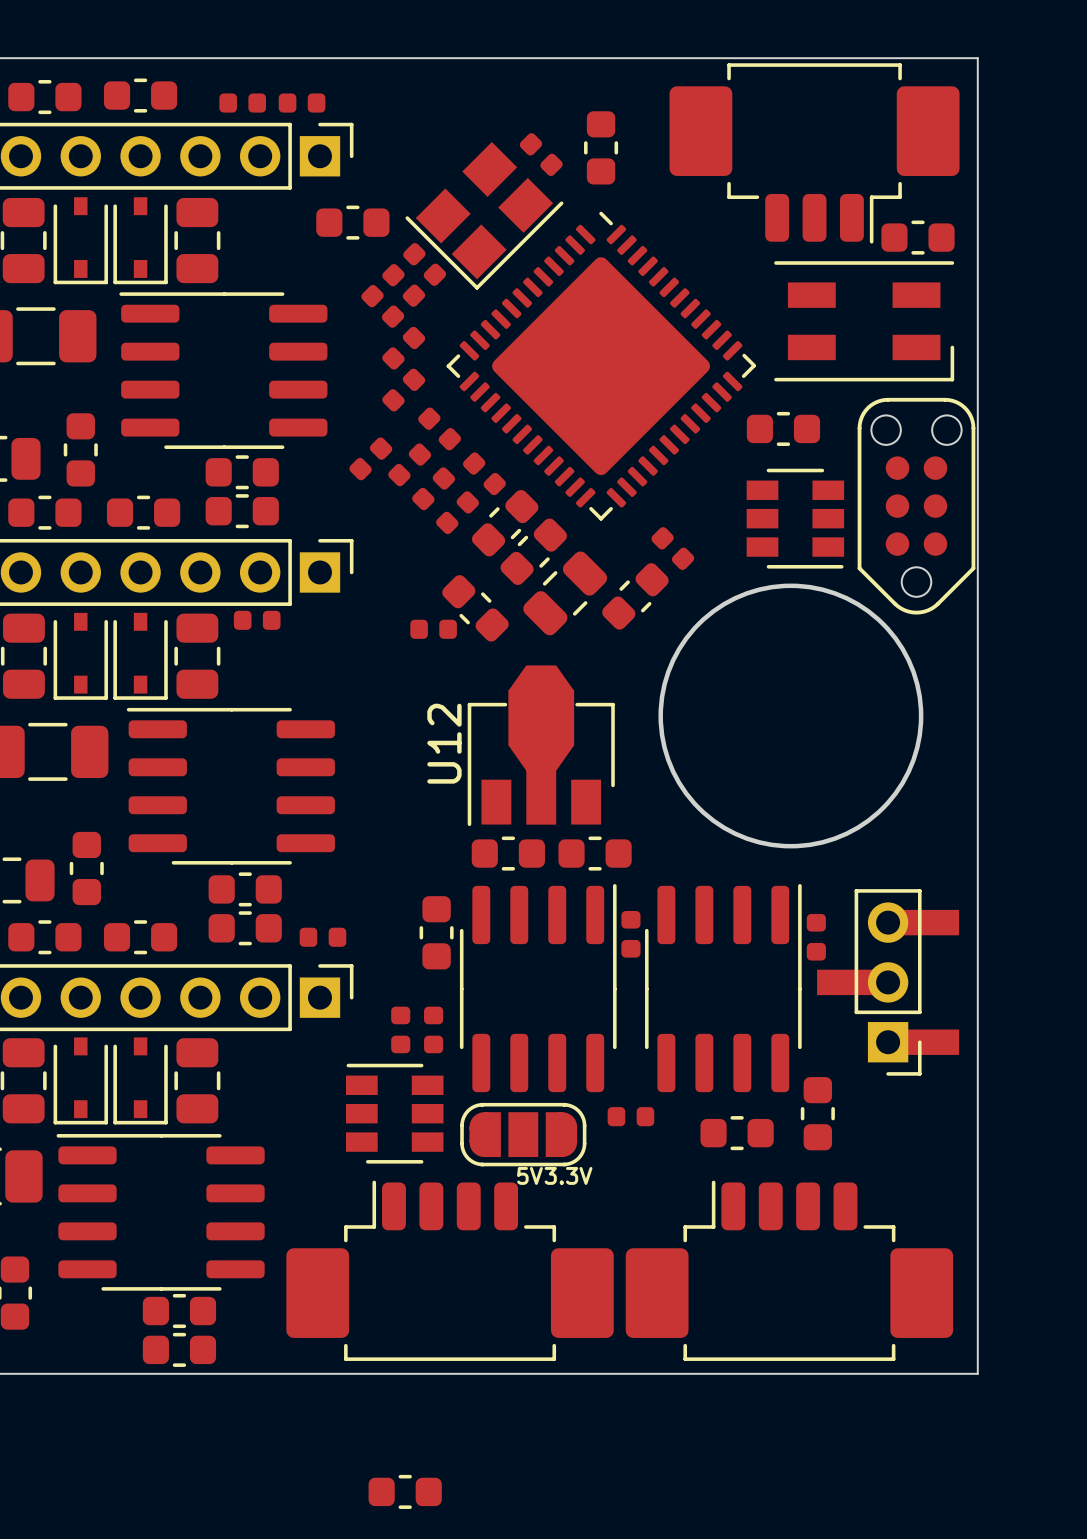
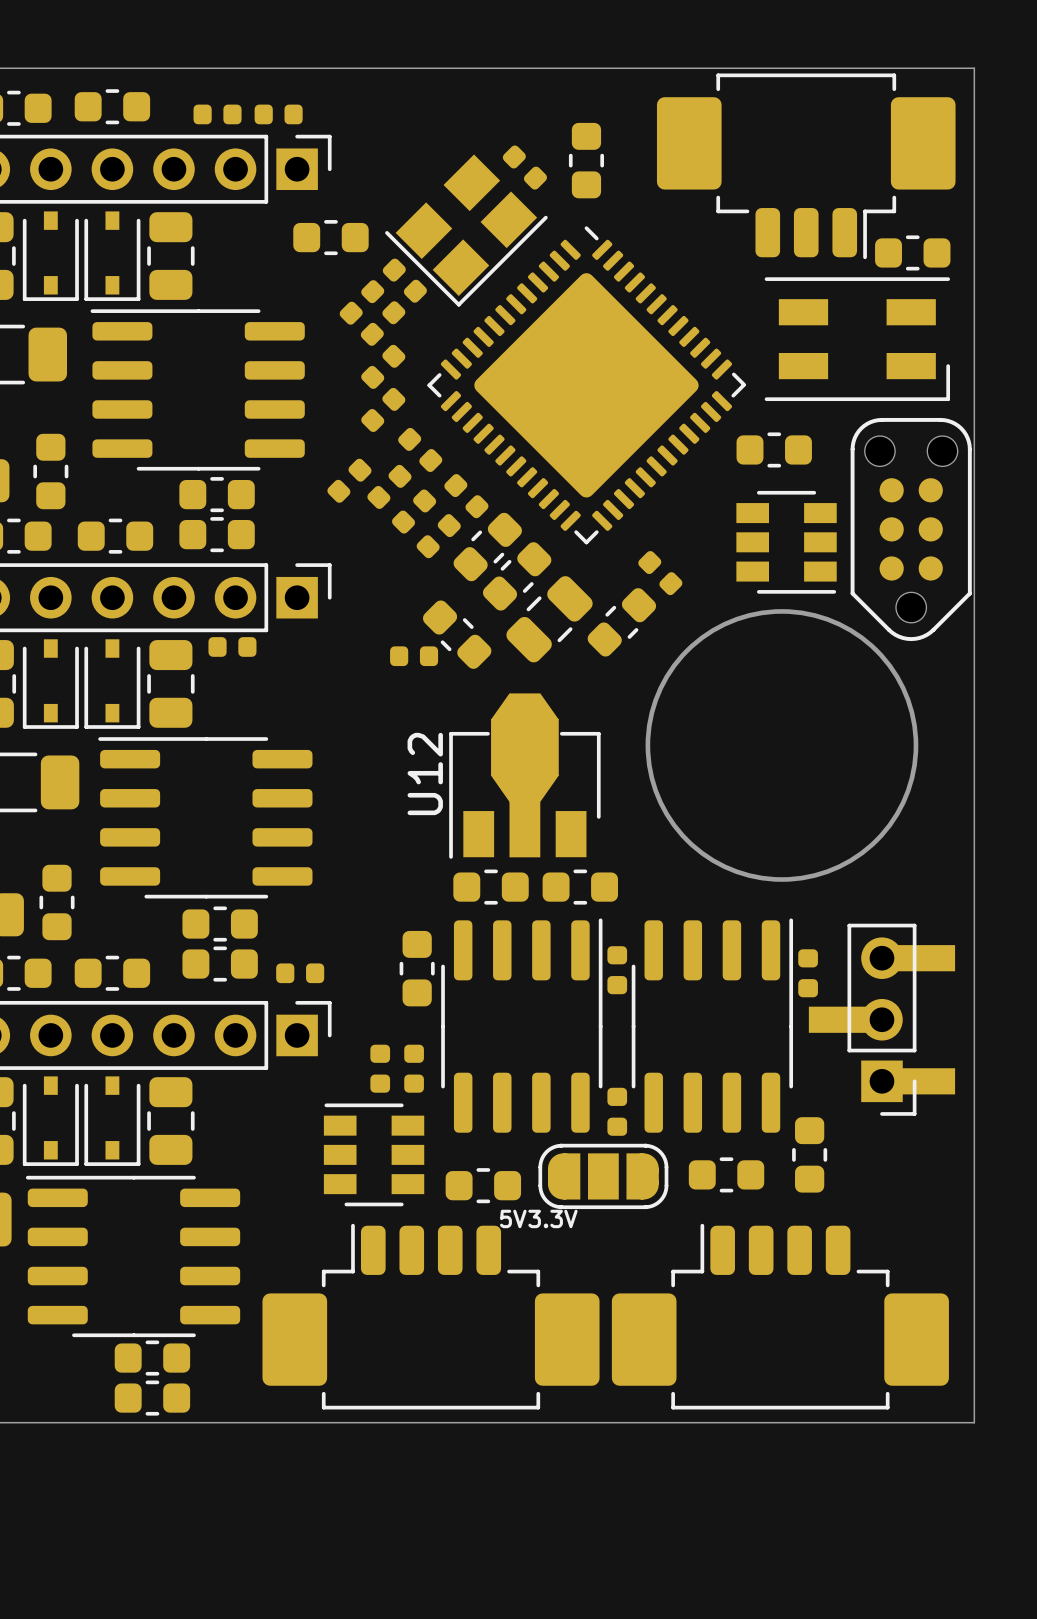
part footprint: [460, 1102, 587, 1167] -> [445, 1168, 522, 1204]
part rotation: 0° (630, 1116) -> 90° clockwise (617, 1111)
part position: (630, 1116) -> (617, 1111)
part: none -> (603, 1176)
part: (405, 1491) -> none

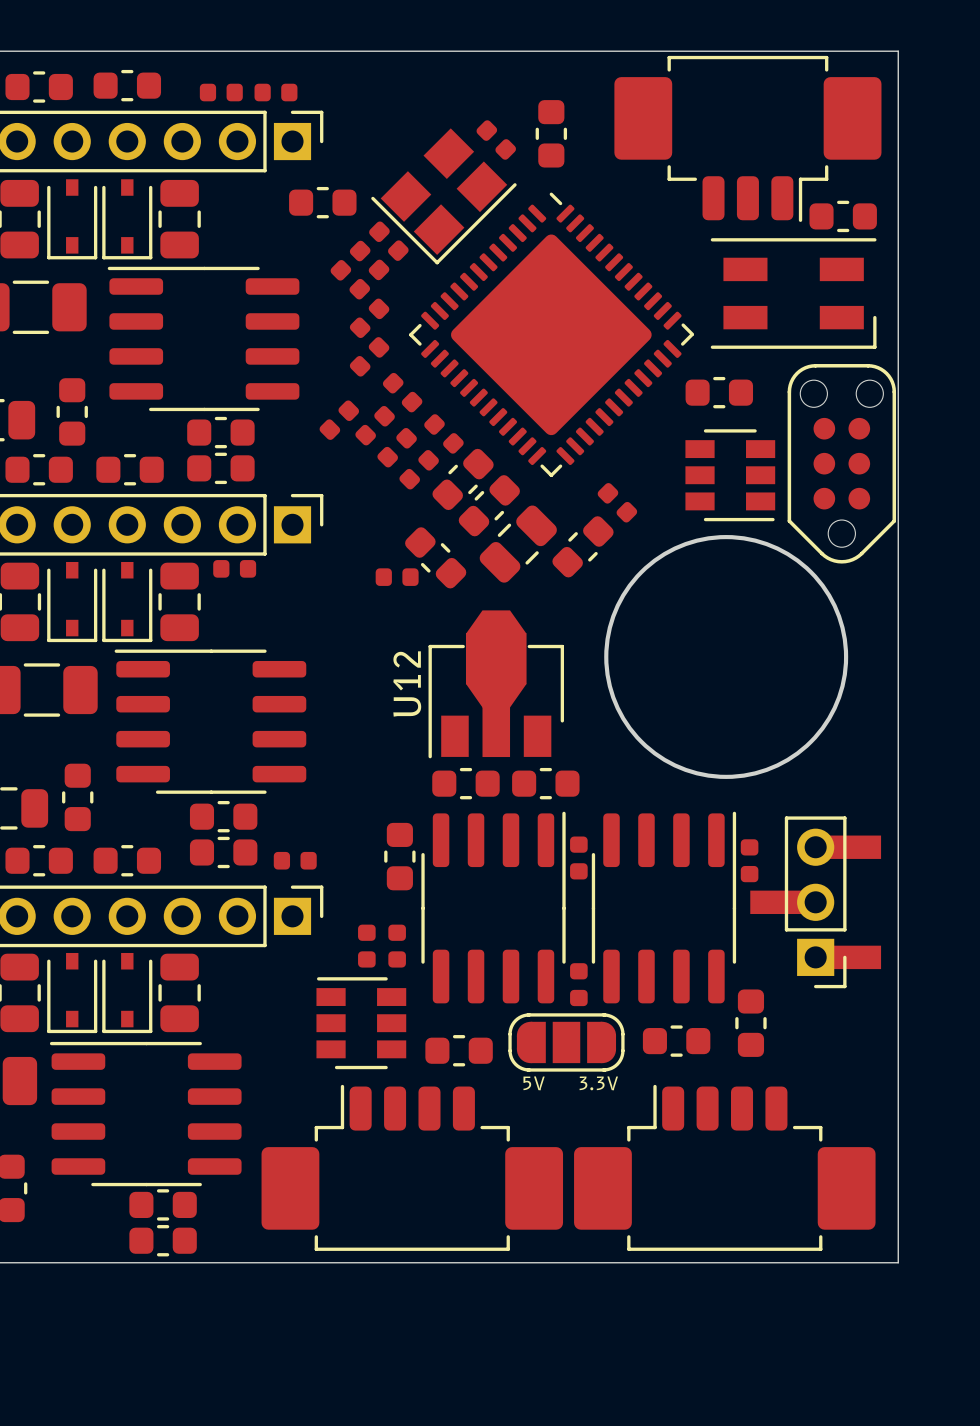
text: 5V (513, 1218) -> none
text: 3.3V (552, 1218) -> 5V (534, 1083)
text: none -> 3.3V (598, 1083)

